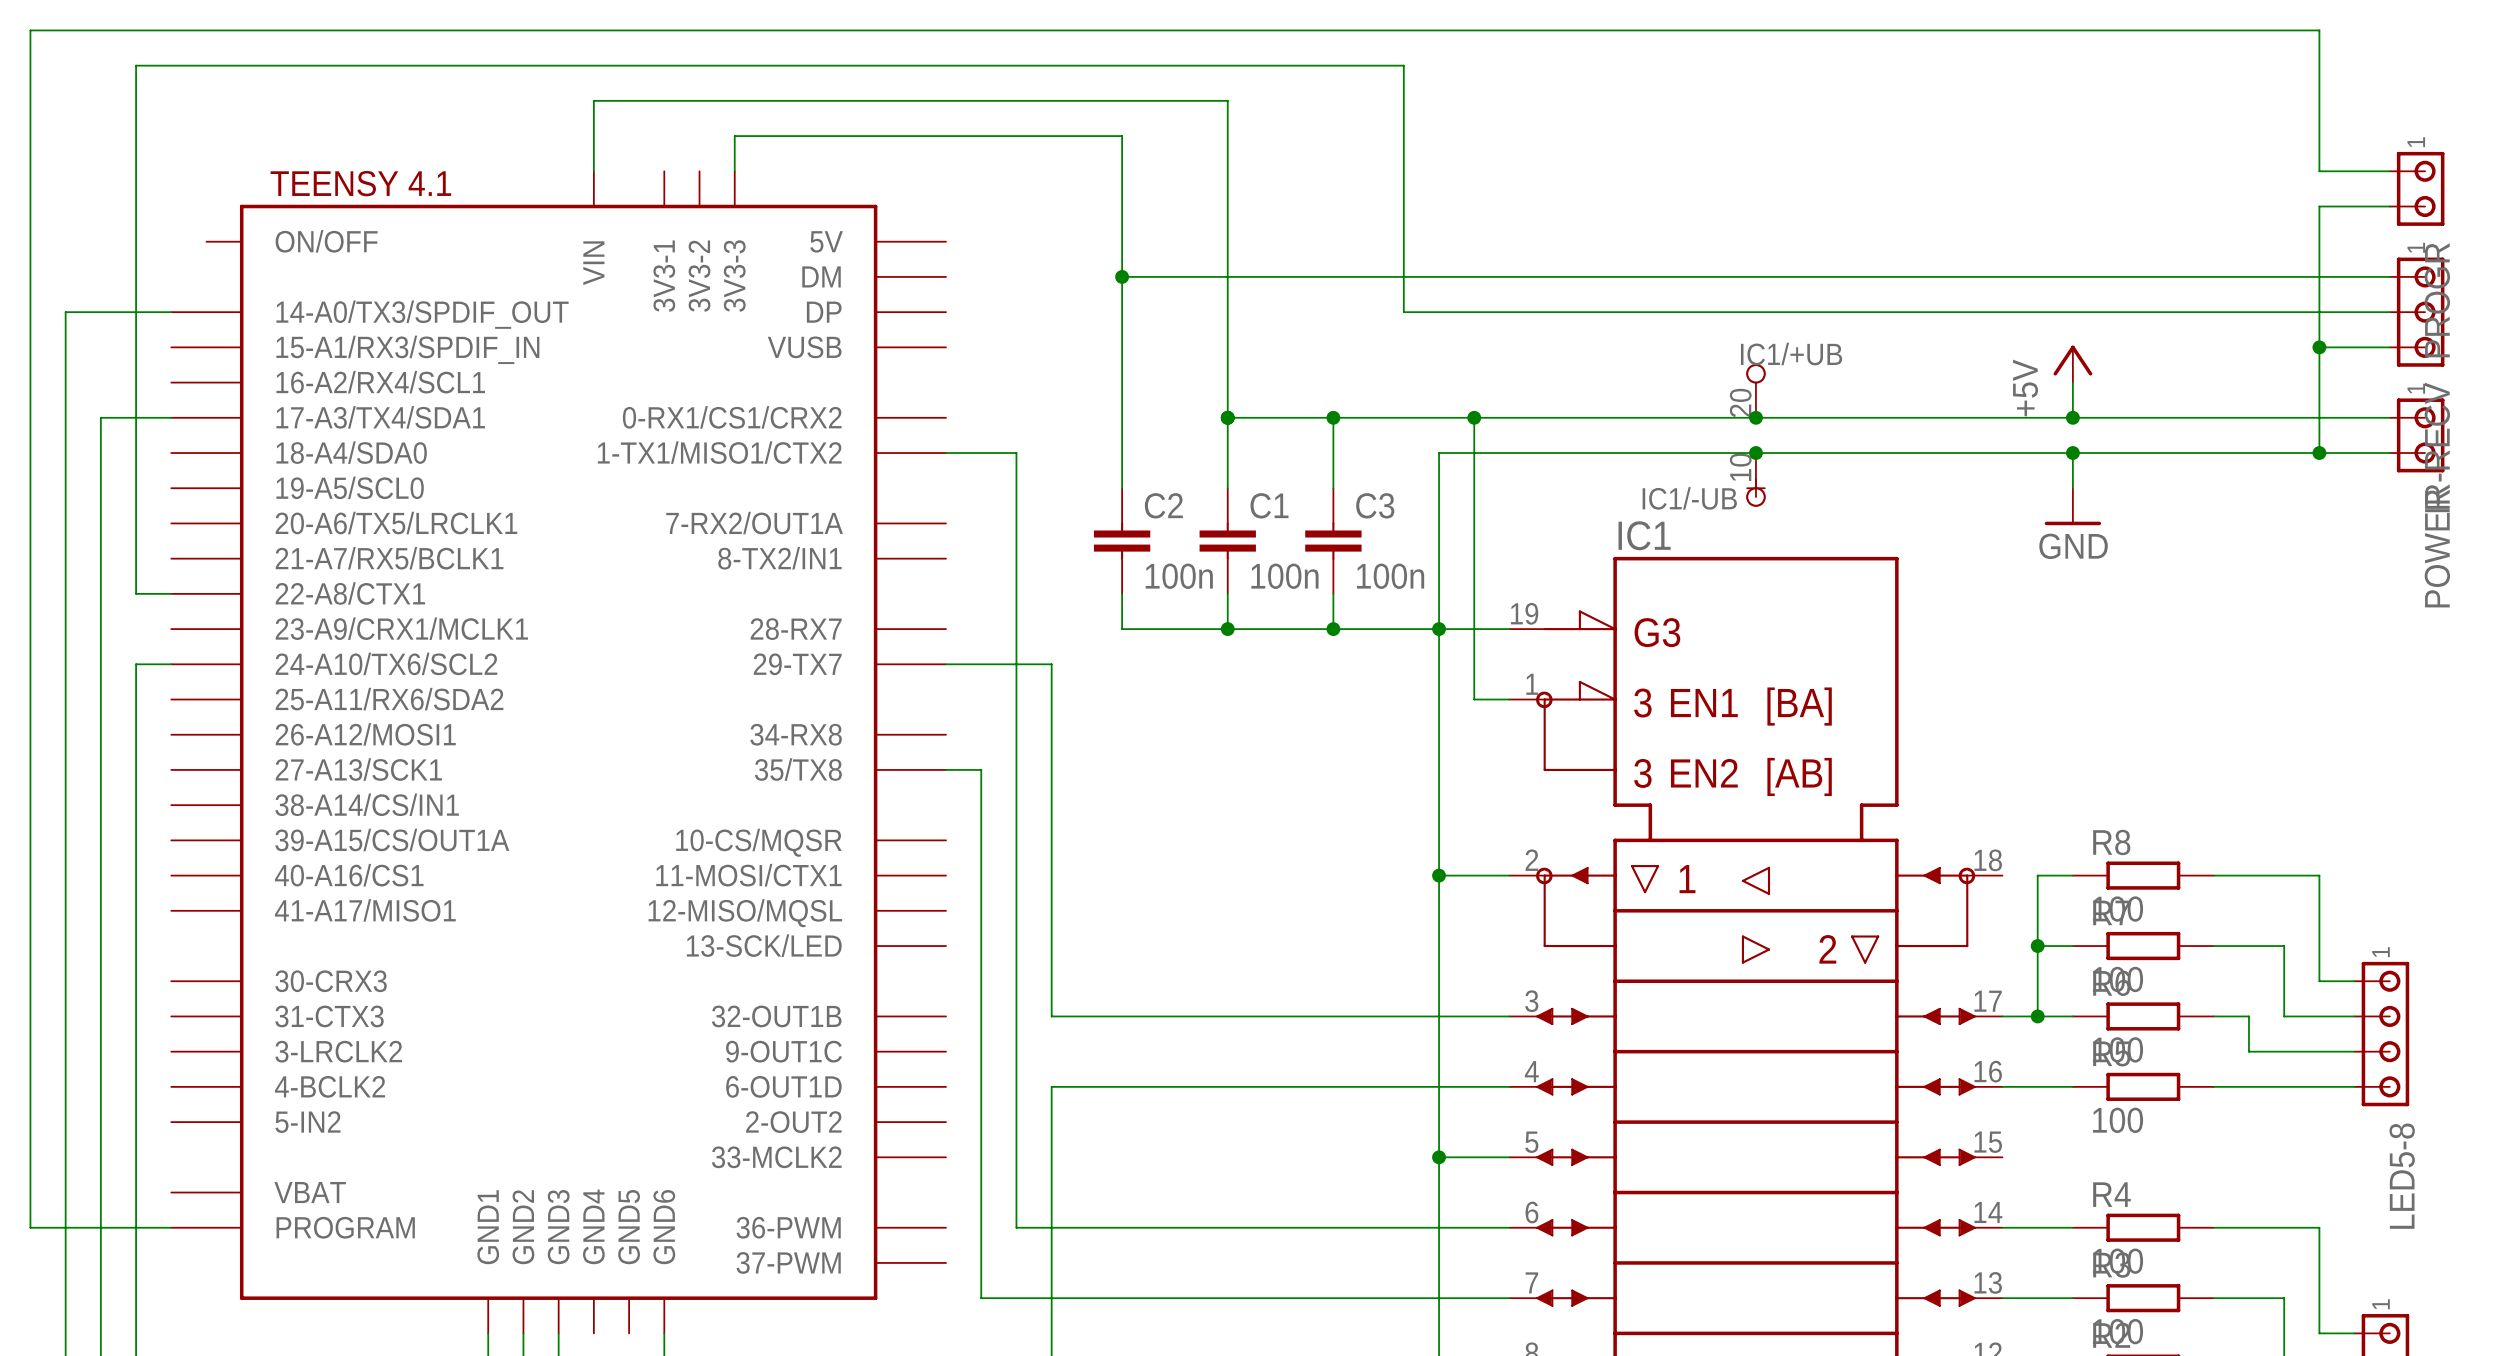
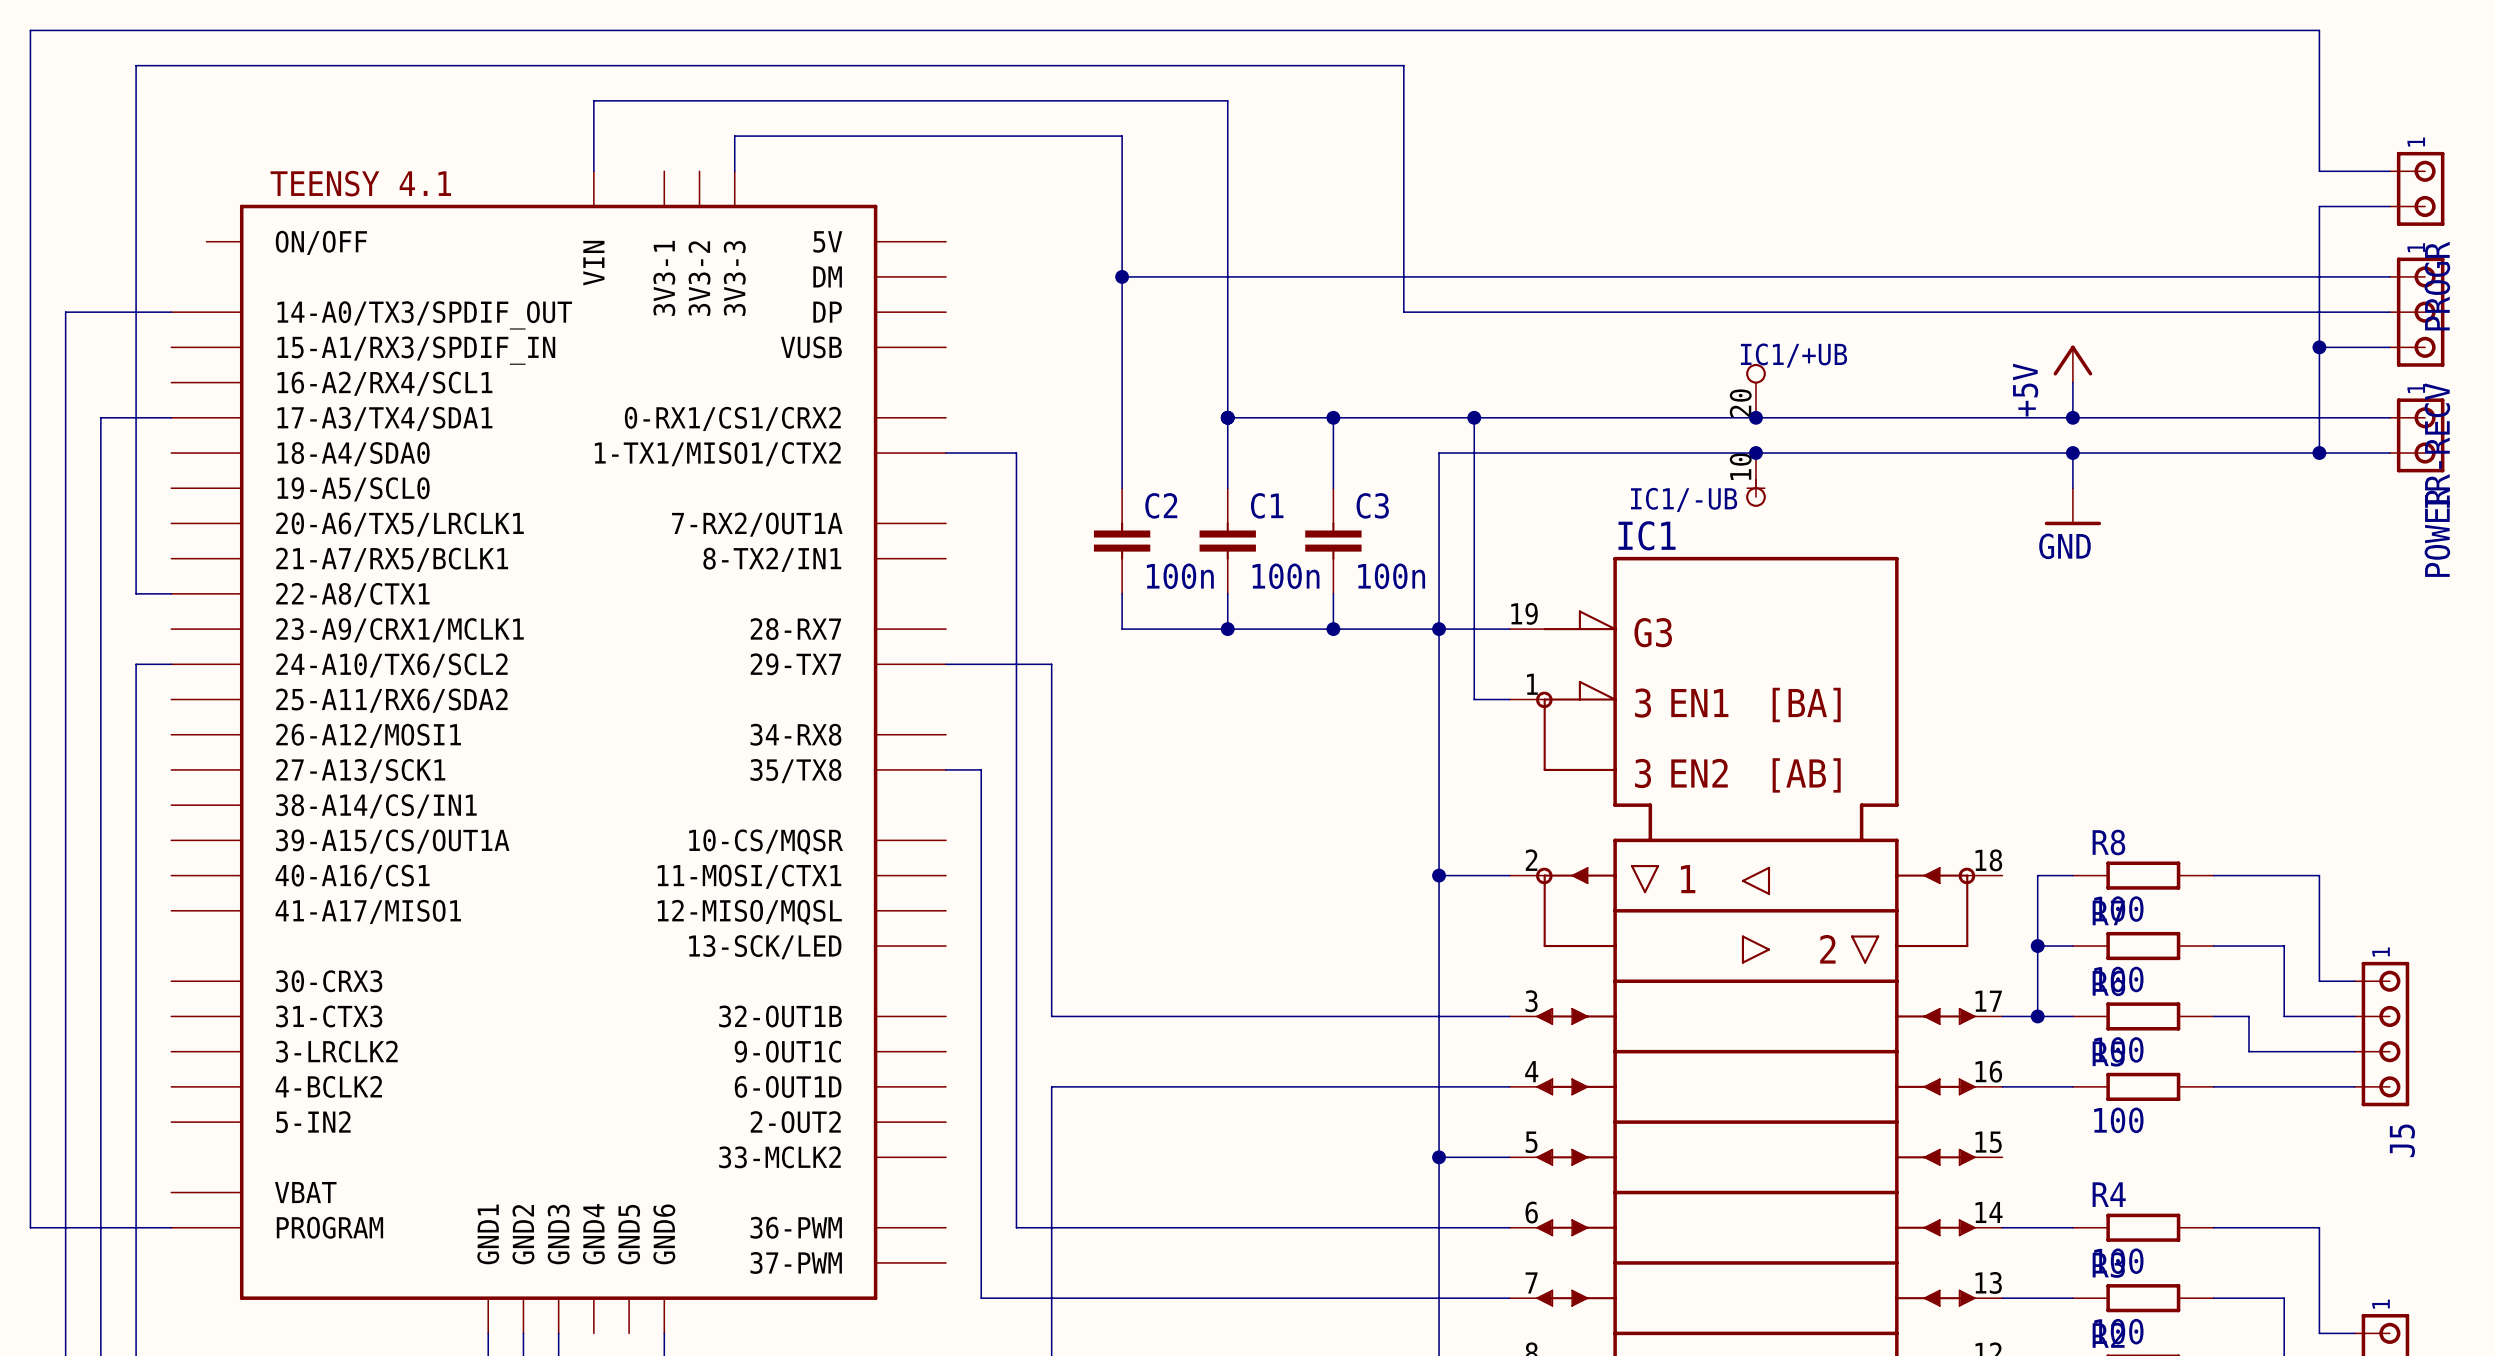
LED5-8 name: LED5-8 (2402, 1176) -> J5 (2402, 1140)

